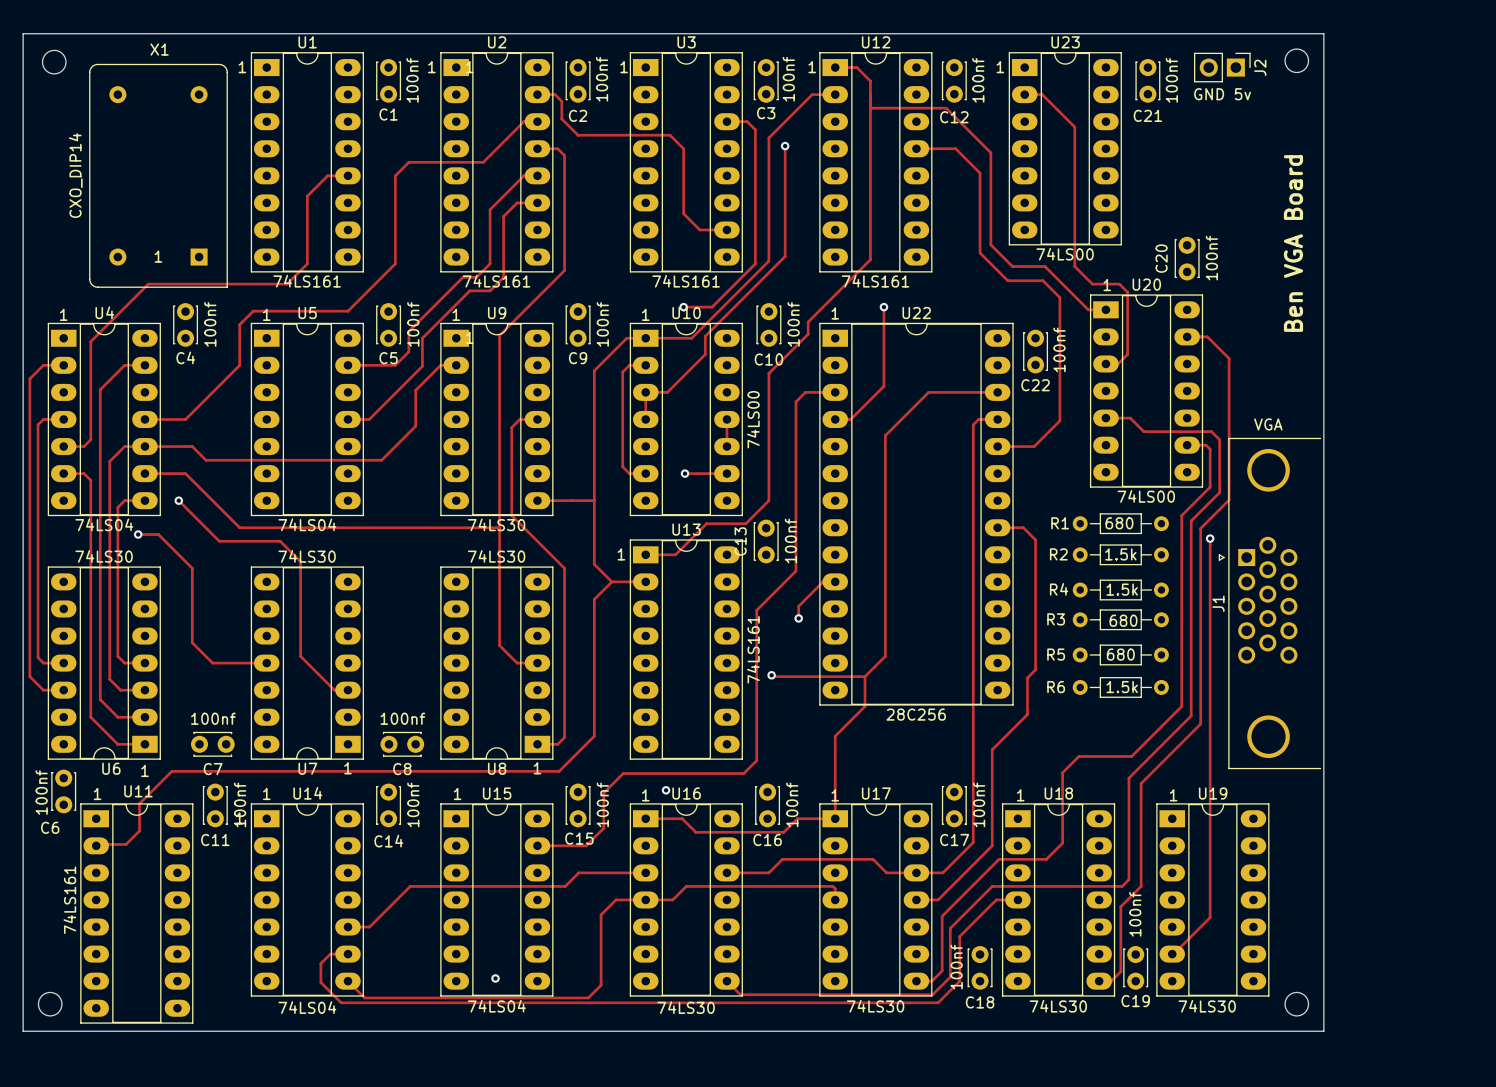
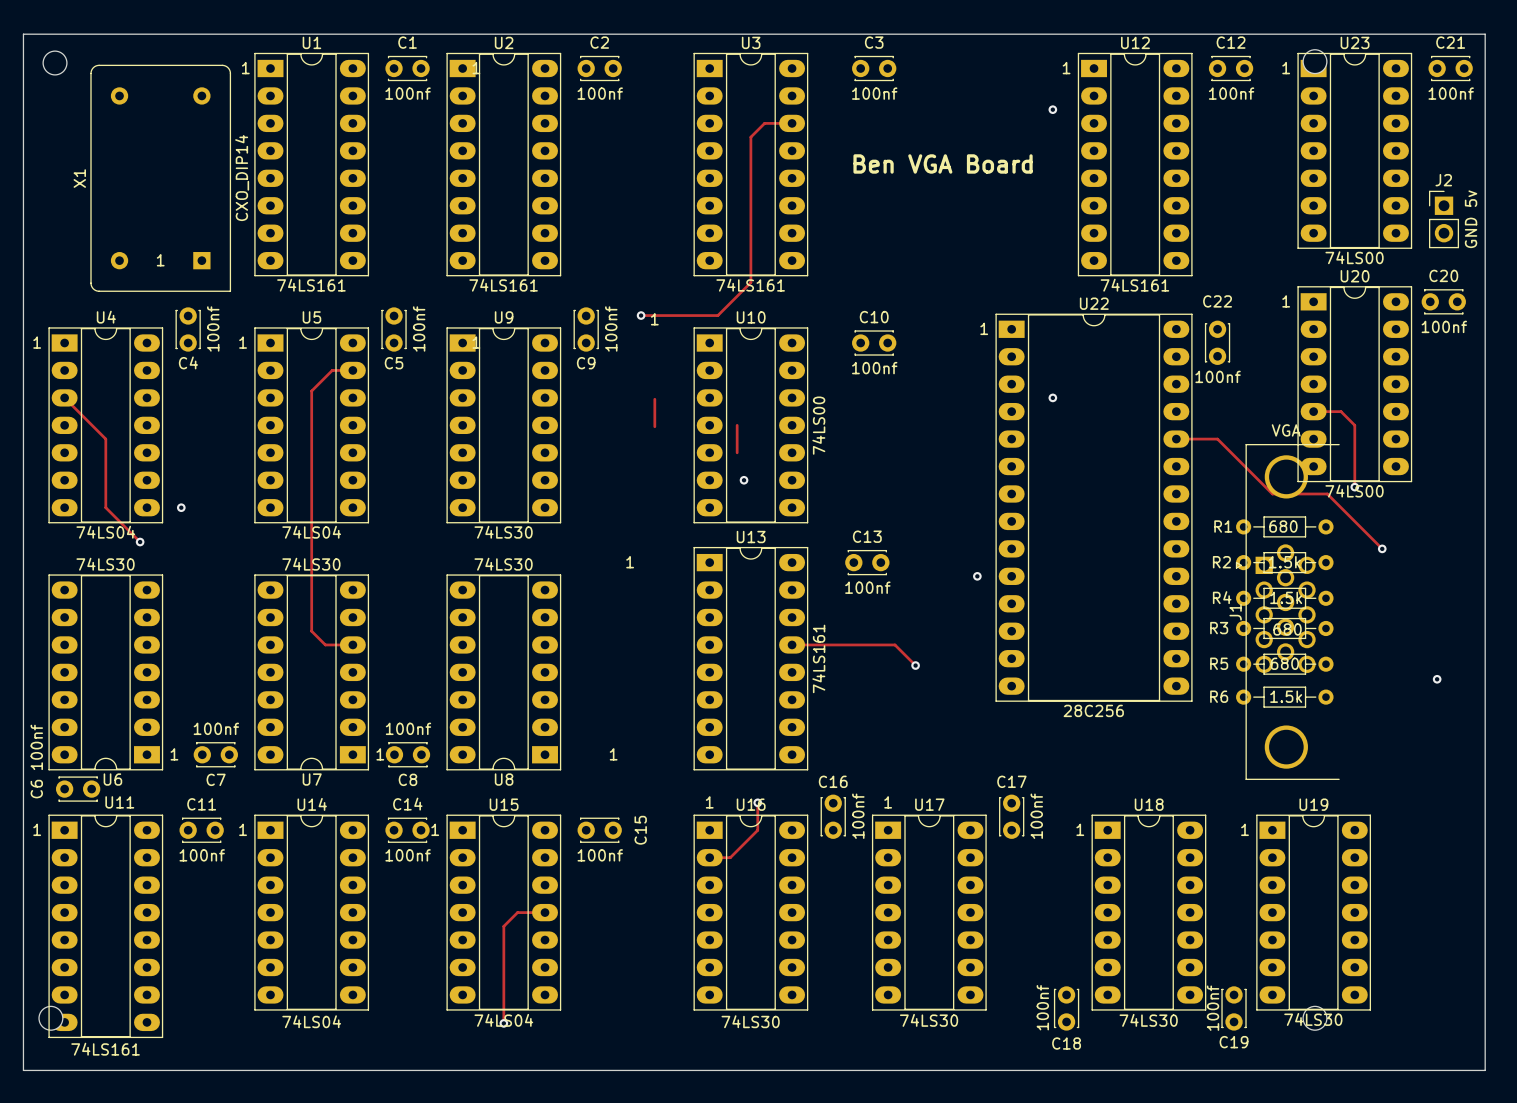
board edge: (1323, 33) (1323, 1031) (23, 1031) -> (1342, 34) (1485, 34) (1485, 1070) (23, 1070) (23, 1045)
X1 name rotation: 0° (159, 49) -> 90° counterclockwise (79, 178)
X1 name position: X1 (159, 49) -> X1 (79, 178)
text: 1 (431, 67) -> none
text: 1 (624, 67) -> none
text: 1 (812, 67) -> none
track: (835, 67) (856, 67) (870, 81) (870, 259) (808, 322) (808, 334) (768, 373) (768, 500) (745, 523) (706, 523) (675, 554) (645, 554) -> none
text position: 1 (1000, 67) -> 1 (1066, 68)
J2 rotation: 0° (1222, 67) -> 90° counterclockwise (1444, 219)
J2 position: (1222, 67) -> (1444, 219)
text: none -> 1 (1286, 68)
C1 rotation: 0° (388, 80) -> 90° clockwise (407, 68)
C2 rotation: 0° (578, 80) -> 90° clockwise (599, 68)
C3 rotation: 0° (766, 80) -> 90° clockwise (874, 68)
C3 position: (766, 80) -> (874, 68)
C12 rotation: 0° (954, 80) -> 90° clockwise (1231, 68)
C12 position: (954, 80) -> (1231, 68)
C21 rotation: 0° (1147, 80) -> 90° clockwise (1450, 68)
C21 position: (1147, 80) -> (1450, 68)
track: (537, 94) (555, 94) (561, 101) (561, 118) (578, 135) (670, 135) (683, 148) (683, 213) (699, 229) (726, 229) -> none
track: (835, 94) (812, 94) (768, 137) (768, 261) (691, 338) (626, 338) (594, 370) (594, 564) (611, 581) -> none
track: (1024, 94) (1042, 94) (1074, 127) (1074, 266) (1092, 284) (1119, 284) (1127, 292) (1127, 354) (1118, 363) (1105, 363) -> none
via: none -> (1052, 109)
track: (870, 109) (946, 108) (990, 152) (990, 244) (1012, 266) (1045, 266) (1088, 309) (1105, 309) (1105, 303) -> none
C3 name position: C3 (766, 113) -> C3 (874, 42)
C1 name position: C1 (388, 114) -> C1 (407, 42)
C2 name position: C2 (578, 115) -> C2 (599, 42)
C21 name position: C21 (1147, 115) -> C21 (1450, 42)
C12 name position: C12 (954, 117) -> C12 (1231, 42)
track: (537, 121) (523, 121) (483, 162) (408, 162) (395, 175) (395, 263) (347, 311) (253, 311) (239, 324) (239, 365) (185, 419) (144, 419) -> none
track: (726, 121) (747, 121) (755, 129) (755, 263) (740, 278) -> (792, 123) (764, 123) (750, 137) (750, 282)
track: (785, 146) (785, 256) (705, 336) (705, 354) (667, 392) (645, 392) -> none
via: (785, 146) -> none
track: (537, 148) (557, 148) (564, 155) (564, 270) (499, 335) (499, 645) (517, 663) (537, 663) -> none
track: (916, 148) (955, 148) (980, 173) (980, 252) (1007, 280) (1043, 280) (1059, 297) (1059, 420) (1034, 446) (997, 446) -> none
U23 position: (1065, 148) -> (1354, 150)
text: none -> Ben VGA Board (943, 163)
U3 position: (686, 162) -> (750, 164)
U12 position: (875, 162) -> (1135, 164)
X1 value position: CXO_DIP14 (75, 175) -> CXO_DIP14 (242, 178)
track: (347, 175) (327, 175) (307, 196) (307, 263) (287, 284) (148, 284) (90, 341) (90, 439) (84, 446) (63, 446) -> none
track: (537, 175) (523, 175) (490, 209) (490, 263) (476, 277) (463, 277) (408, 331) (408, 351) (395, 365) (347, 365) -> (352, 644) (325, 644) (311, 631) (311, 391) (332, 370) (352, 370)
track: (537, 202) (517, 202) (503, 216) (503, 277) (490, 290) (469, 290) (422, 338) (422, 366) (369, 419) (347, 419) -> none
text: Ben VGA Board (1293, 243) -> none
C20 rotation: 0° (1187, 258) -> 90° clockwise (1443, 301)
C20 position: (1187, 258) -> (1443, 301)
text: 1 (1107, 285) -> none
text: none -> 1 (1286, 301)
track: (683, 307) (712, 307) -> (641, 315) (717, 315) (722, 311)
via position: (683, 307) -> (641, 315)
track: (883, 307) (883, 386) (850, 419) (835, 419) -> none
via: (883, 307) -> none
text: 1 (835, 313) -> none
text position: 1 (63, 314) -> 1 (37, 342)
text position: 1 (266, 314) -> 1 (243, 342)
text: 1 (456, 314) -> none
C10 rotation: 0° (768, 324) -> 90° clockwise (874, 343)
C10 position: (768, 324) -> (874, 343)
text: none -> 1 (984, 328)
track: (1187, 336) (1207, 336) (1229, 358) (1229, 500) (1200, 528) (1200, 724) (1141, 783) (1141, 886) (1120, 906) (1120, 971) (1111, 981) (1099, 981) -> none
C22 value rotation: 0° (1059, 349) -> 90° clockwise (1218, 376)
C22 position: (1035, 351) -> (1217, 342)
C10 name position: C10 (768, 359) -> C10 (874, 317)
track: (63, 365) (43, 365) (29, 378) (29, 676) (43, 690) (63, 690) -> none
track: (144, 365) (124, 365) (100, 389) (100, 699) (117, 717) (144, 717) -> none
track: (456, 365) (440, 365) (415, 390) (415, 426) (381, 460) (206, 460) (192, 446) (124, 446) (109, 461) (109, 679) (120, 690) (144, 690) -> none
track: (645, 365) (629, 365) (622, 372) (622, 466) (629, 473) (645, 473) -> none
C22 name position: C22 (1035, 385) -> C22 (1217, 301)
U20 position: (1146, 391) -> (1354, 384)
track: (835, 392) (805, 392) (795, 401) (795, 571) (756, 610) (756, 760) (743, 773) (623, 773) (603, 793) (603, 828) (586, 845) (537, 845) -> none
track: (997, 392) (928, 392) (885, 435) (885, 656) (865, 676) -> none
via: none -> (1052, 397)
track: none -> (1313, 411) (1341, 411) (1354, 425) (1354, 487)
track: (996, 418) (997, 419) (978, 419) (973, 424) (973, 842) (942, 872) (886, 872) (873, 859) (782, 859) (768, 872) (726, 872) -> none
track: (1105, 418) (1130, 418) (1143, 431) (1211, 431) (1219, 439) (1219, 492) (1191, 520) (1191, 715) (1128, 778) (1128, 879) (1122, 886) (992, 886) (950, 928) (950, 977) (932, 994) (740, 994) (726, 981) -> none
track: (63, 419) (43, 419) (38, 424) (38, 657) (43, 663) (63, 663) -> none
track: (537, 419) (519, 419) (511, 427) (511, 515) (564, 568) (564, 737) (557, 744) (537, 744) -> none
U10 position: (686, 419) -> (750, 425)
track: none -> (1176, 439) (1217, 439) (1272, 493) (1327, 493) (1382, 548)
track: (1187, 445) (1206, 445) (1210, 449) (1210, 487) (1181, 515) (1181, 706) (1131, 756) (1078, 756) (1062, 772) (1062, 843) (1046, 859) (999, 859) (942, 916) (942, 970) (931, 981) (916, 981) -> none
track: (63, 473) (84, 473) (90, 480) (90, 717) (117, 744) (144, 744) -> none
track: (144, 473) (185, 473) (239, 527) (499, 527) -> none
track: (684, 473) (726, 473) -> none
via position: (684, 473) -> (744, 480)
via: none -> (1354, 487)
track: (144, 500) (124, 500) (117, 507) (117, 656) (124, 663) (144, 663) -> none
track: (178, 500) (219, 541) (280, 541) (300, 561) (300, 656) (334, 690) (347, 690) -> none
track: (537, 500) (594, 500) -> none
U22 position: (916, 514) -> (1094, 507)
R1 position: (1120, 523) -> (1284, 526)
track: (997, 527) (1023, 527) (1035, 539) (1035, 669) (1027, 677) (1027, 714) (992, 749) (992, 845) (938, 899) (916, 899) -> none
track: (138, 534) (158, 534) (192, 568) (192, 642) (212, 663) (266, 663) -> (140, 542) (105, 507) (105, 439) (64, 397)
track: (1210, 538) (1210, 917) (1173, 954) -> none
via: (1210, 538) -> none
C13 rotation: 0° (766, 541) -> 90° clockwise (867, 562)
C13 position: (766, 541) -> (867, 562)
via: none -> (1382, 548)
R2 position: (1120, 554) -> (1284, 562)
via: none -> (977, 576)
track: (611, 581) (645, 581) -> none
track: (611, 581) (594, 599) (594, 736) (559, 771) (171, 771) (139, 803) (139, 830) (126, 844) (96, 844) -> none
track: (835, 581) (823, 581) (798, 606) (798, 618) -> none
R4 position: (1120, 590) -> (1284, 598)
via: (798, 618) -> none
R3 position: (1120, 619) -> (1284, 628)
track: none -> (792, 644) (895, 644) (915, 665)
U13 position: (686, 649) -> (750, 658)
R5 position: (1120, 654) -> (1284, 664)
via: none -> (915, 665)
via: none -> (1437, 679)
track: (771, 675) (865, 676) -> none
via: (771, 675) -> none
track: (865, 676) (865, 706) (835, 736) (835, 818) (797, 818) (783, 832) (695, 832) (682, 818) (645, 818) -> none
R6 position: (1120, 687) -> (1284, 697)
text: none -> 1 (613, 754)
text position: 1 (347, 768) -> 1 (380, 754)
text: 1 (537, 768) -> none
text position: 1 (144, 770) -> 1 (174, 754)
via: (666, 790) -> none
C6 rotation: 0° (63, 791) -> 90° clockwise (78, 789)
U11 name position: U11 (138, 791) -> U11 (119, 802)
text: none -> 1 (709, 802)
track: none -> (757, 802) (757, 830) (730, 857) (709, 857)
via: none -> (757, 802)
C6 value position: 100nf (41, 792) -> 100nf (36, 747)
text: 1 (97, 793) -> none
text: 1 (266, 793) -> none
text position: 1 (457, 793) -> 1 (435, 829)
text: 1 (645, 795) -> none
text position: 1 (835, 795) -> 1 (888, 802)
text position: 1 (1020, 795) -> 1 (1080, 829)
text: 1 (1173, 795) -> none
C11 rotation: 0° (215, 805) -> 90° clockwise (201, 830)
C14 rotation: 0° (388, 805) -> 90° clockwise (407, 830)
C15 rotation: 0° (578, 805) -> 90° clockwise (599, 830)
C16 position: (767, 805) -> (833, 816)
C17 position: (954, 805) -> (1011, 816)
text: none -> 1 (37, 829)
text: none -> 1 (1244, 829)
C15 name position: C15 (579, 838) -> C15 (640, 830)
C11 name position: C11 (215, 840) -> C11 (201, 804)
C16 name position: C16 (767, 840) -> C16 (833, 781)
C17 name position: C17 (954, 840) -> C17 (1011, 781)
C14 name position: C14 (388, 841) -> C14 (407, 804)
track: (645, 872) (578, 872) (565, 886) (410, 886) (369, 927) (347, 927) -> none
track: none -> (545, 912) (517, 912) (503, 926) (503, 1023)
U16 position: (686, 899) -> (750, 912)
track: (835, 899) (835, 888) (832, 886) (686, 886) (672, 899) (615, 899) (601, 914) (601, 985) (588, 997) (364, 997) (347, 981) -> none
U17 position: (875, 899) -> (929, 912)
track: (1020, 899) (996, 899) (959, 936) (959, 981) (938, 1002) (341, 1002) (320, 982) (320, 963) (330, 954) (347, 954) -> none
U18 position: (1058, 899) -> (1148, 912)
U19 position: (1212, 899) -> (1313, 912)
U11 value rotation: 0° (69, 900) -> 90° clockwise (105, 1049)
U11 value position: 74LS161 (69, 900) -> 74LS161 (105, 1049)
U11 position: (136, 913) -> (105, 926)
C19 value position: 100nf (1135, 914) -> 100nf (1213, 1008)
C18 position: (980, 967) -> (1066, 1008)
C19 position: (1135, 967) -> (1234, 1008)
via position: (495, 978) -> (503, 1023)
U19 value position: 74LS30 (1207, 1006) -> 74LS30 (1313, 1019)

